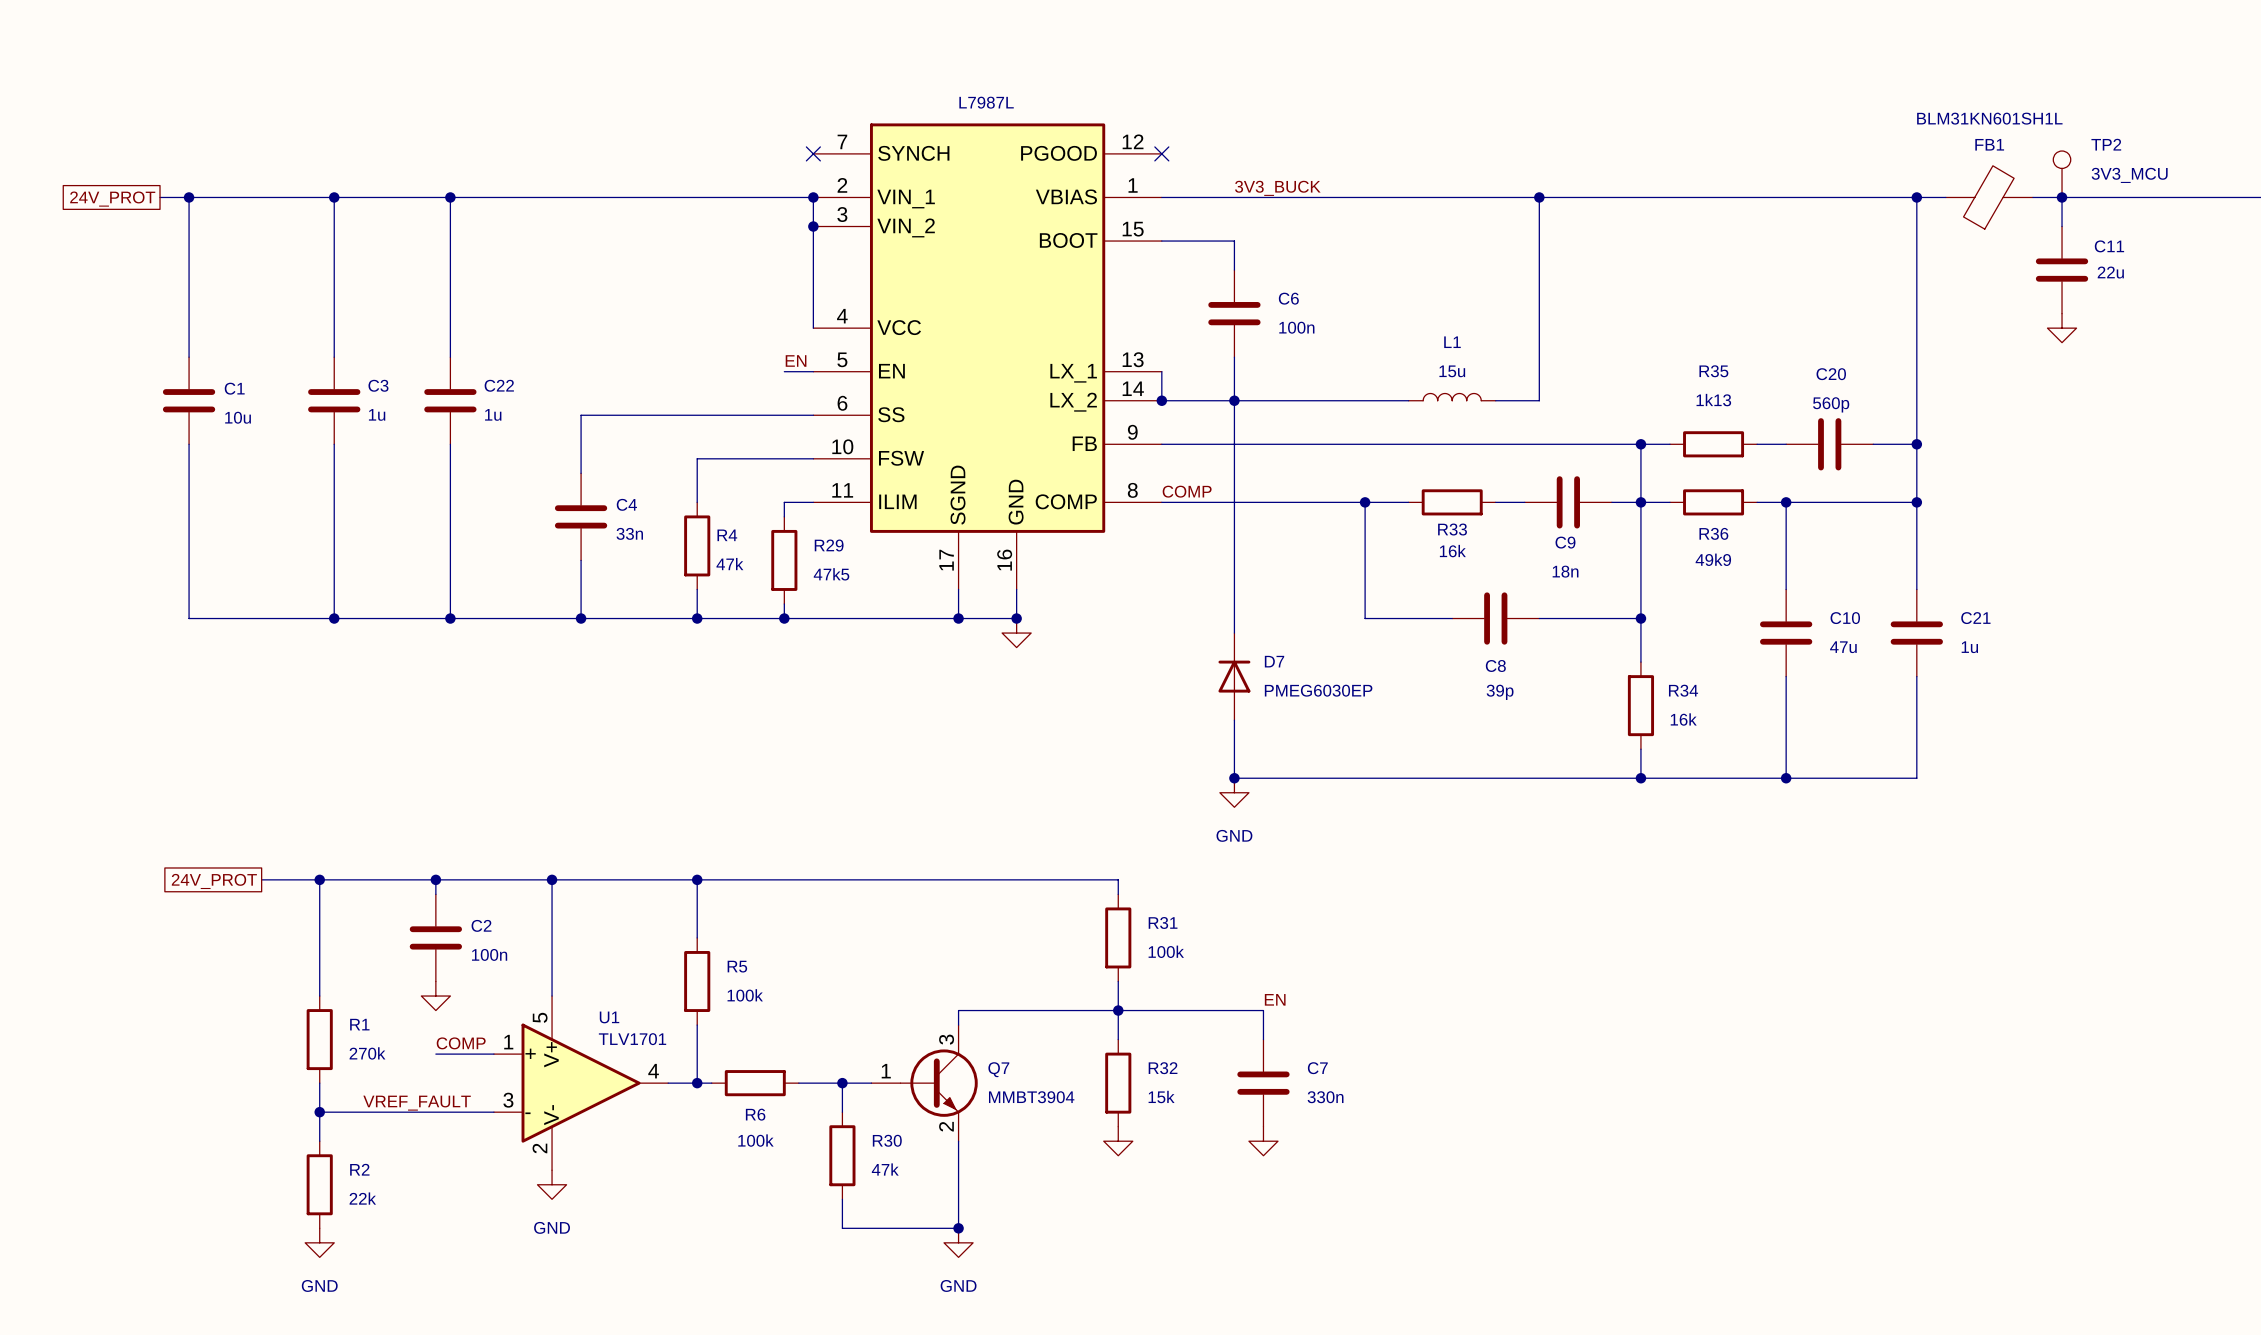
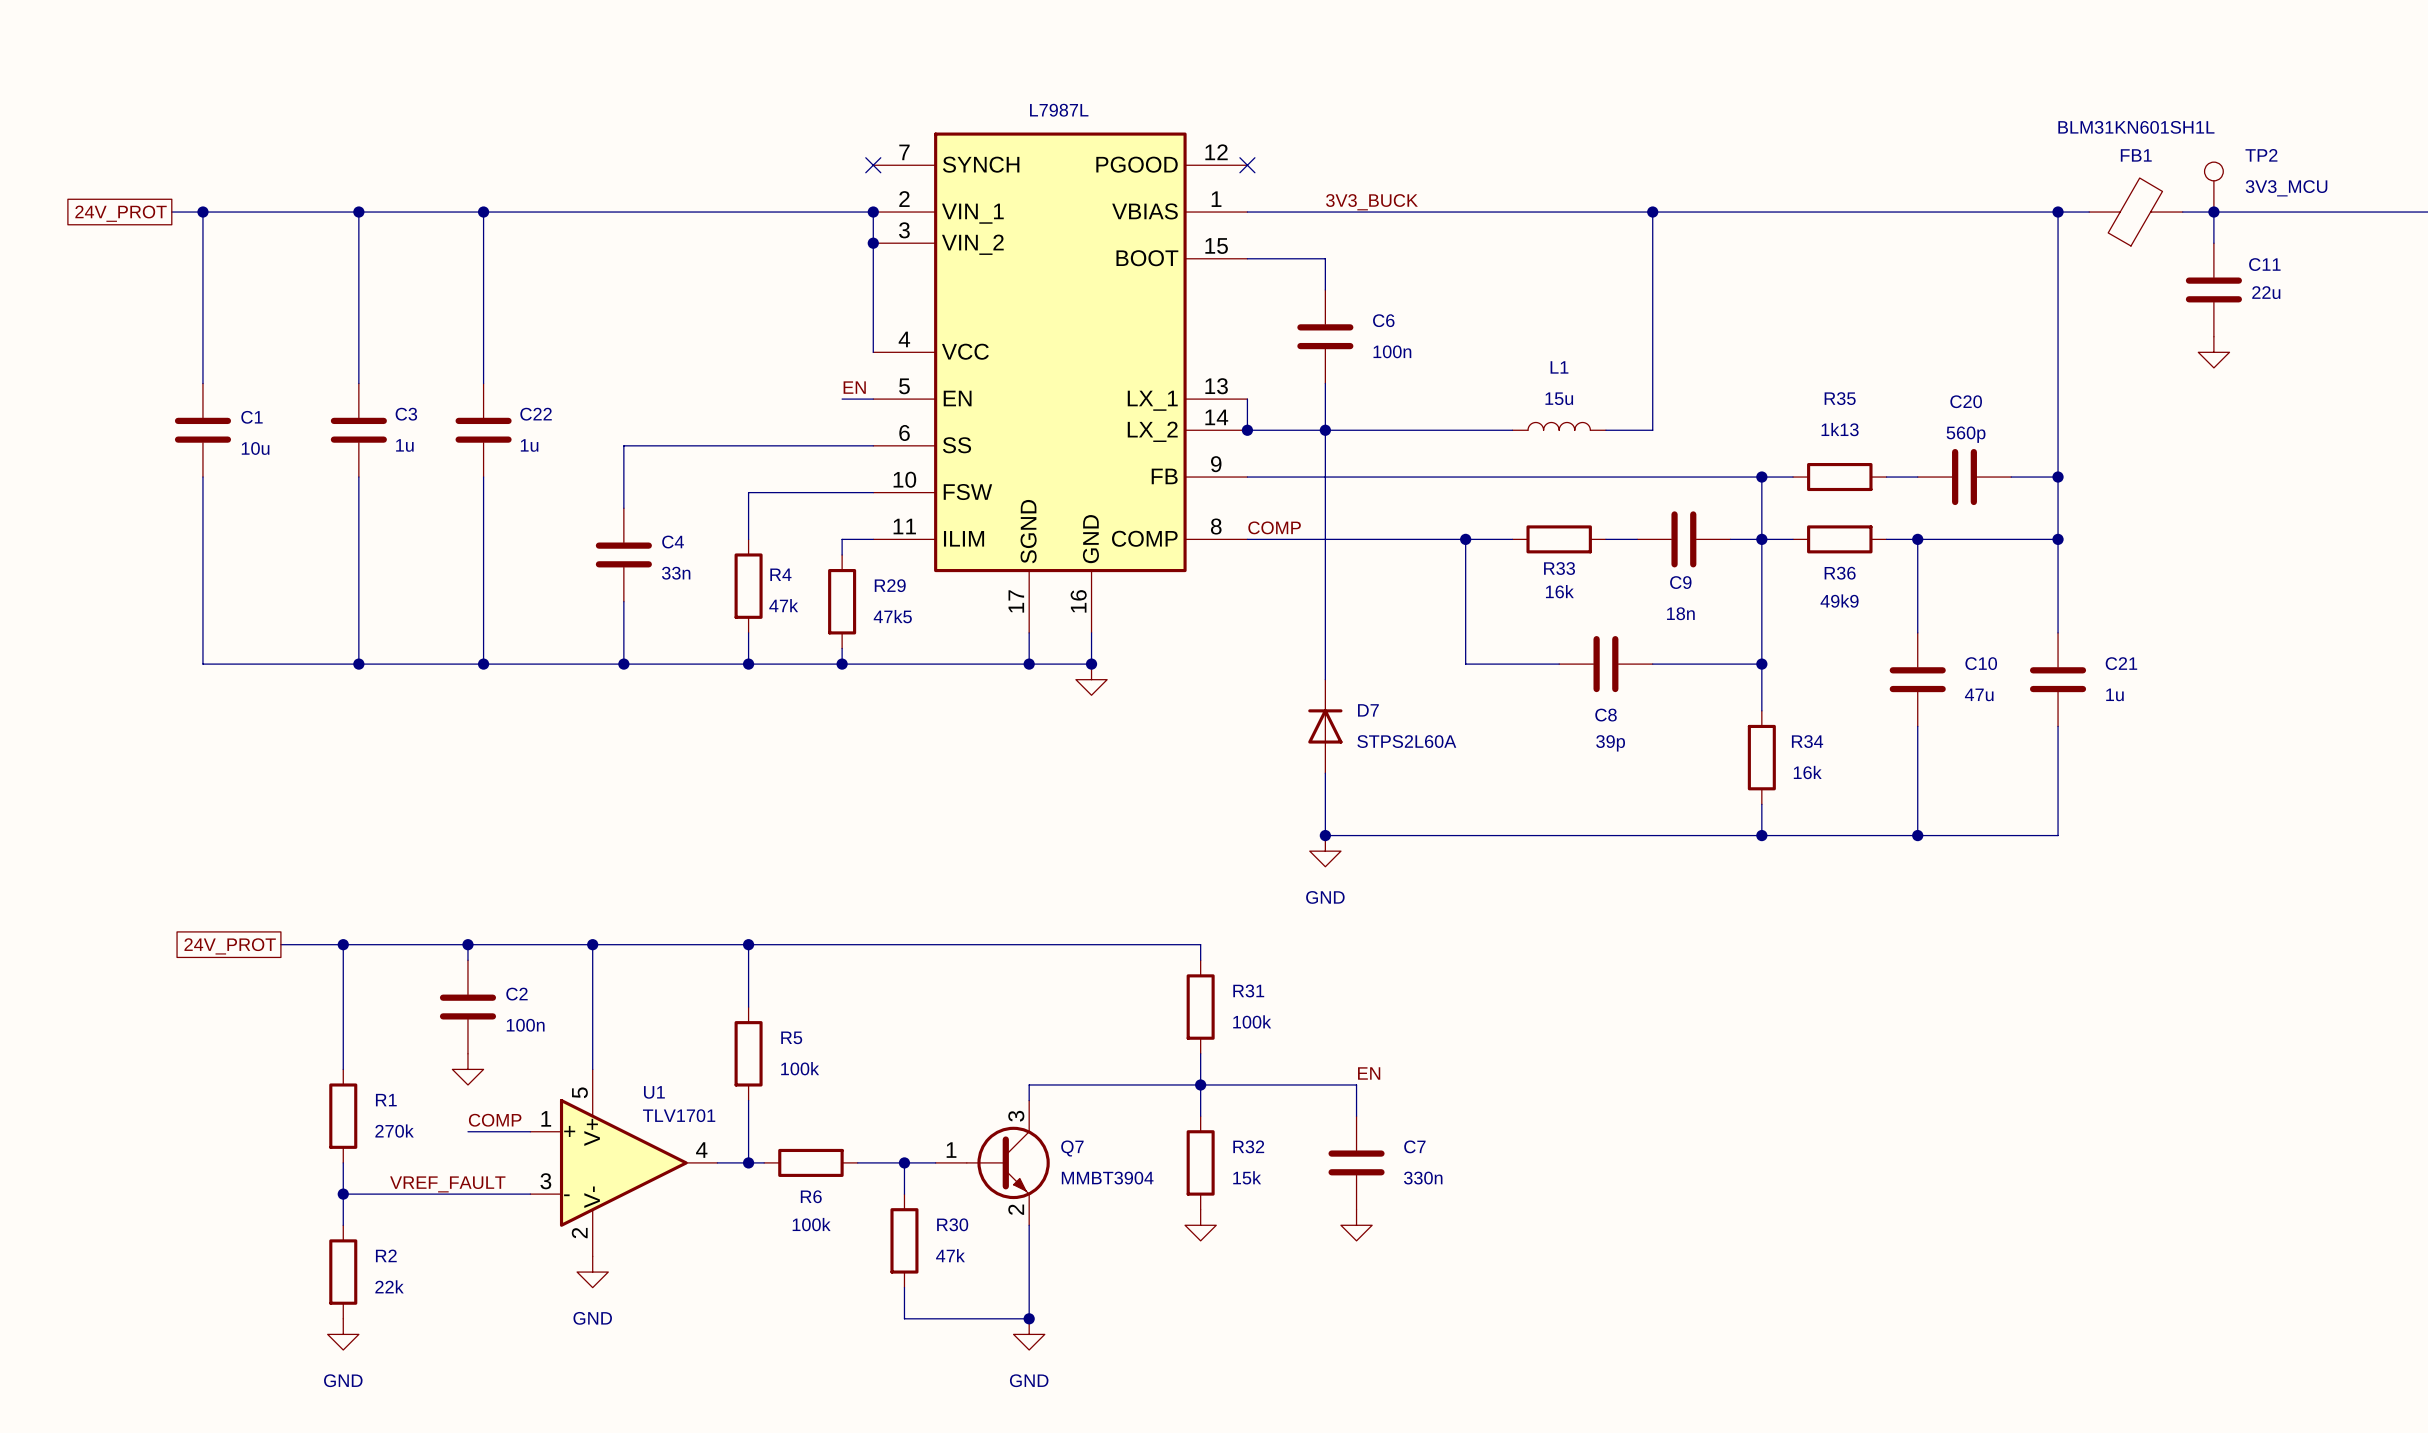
D7 value: PMEG6030EP (1318, 690) -> STPS2L60A (1406, 741)

